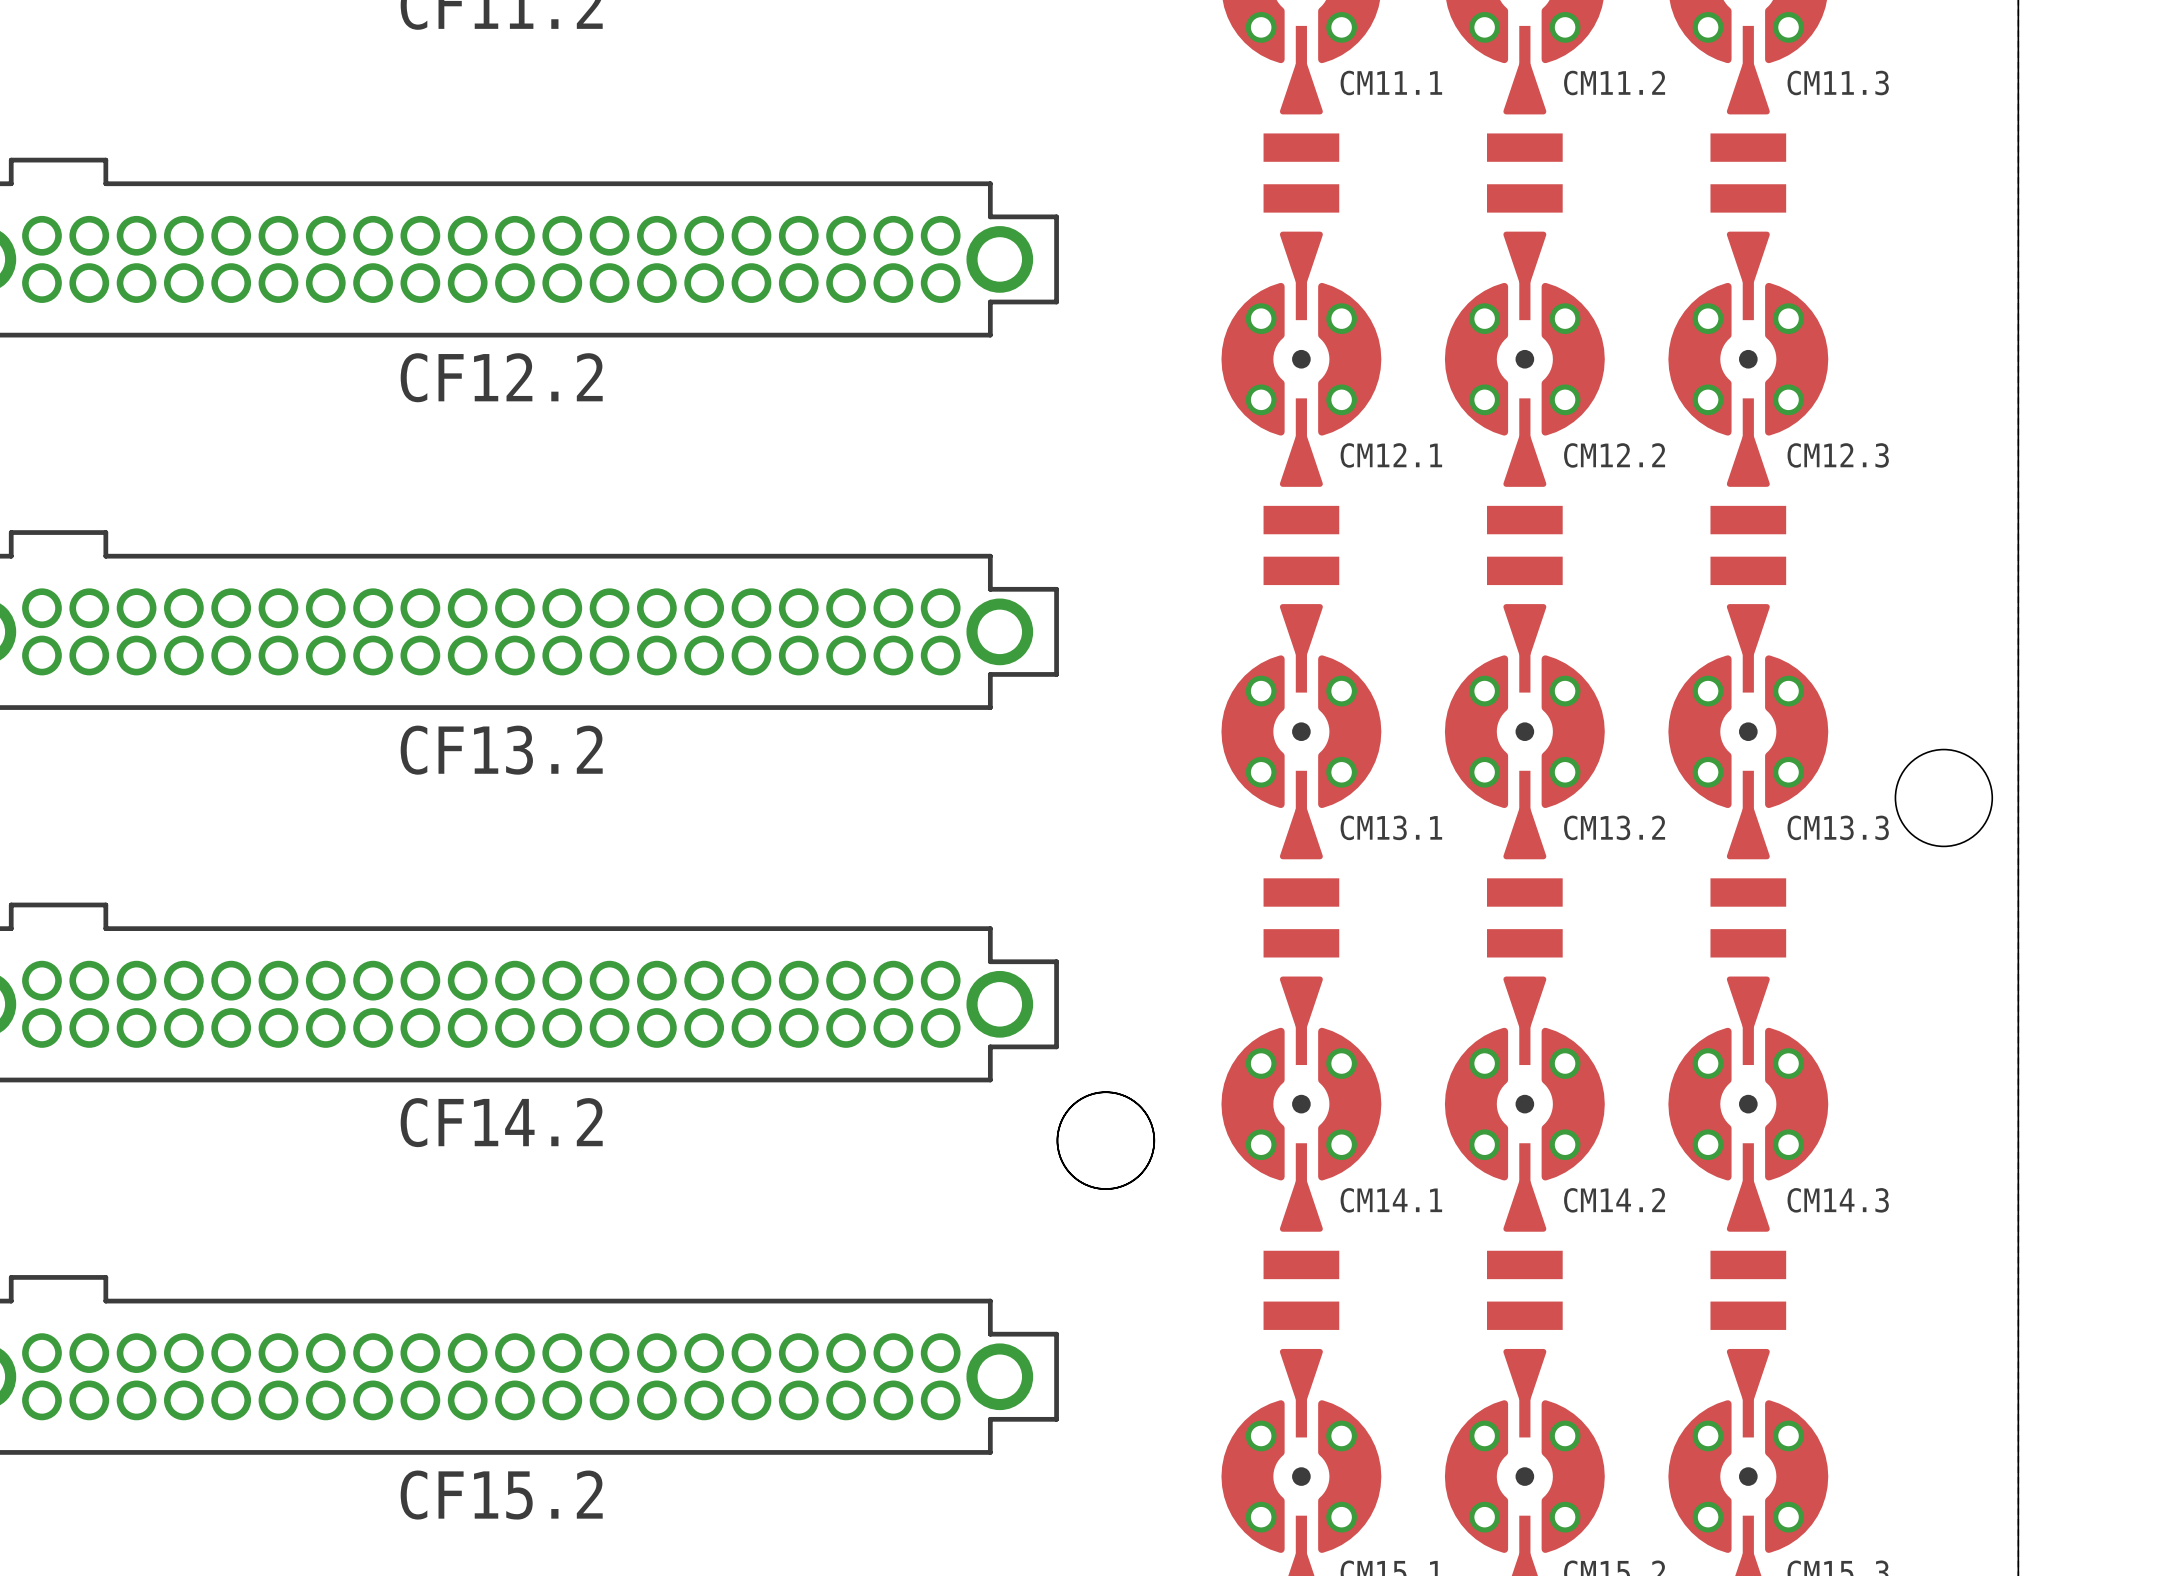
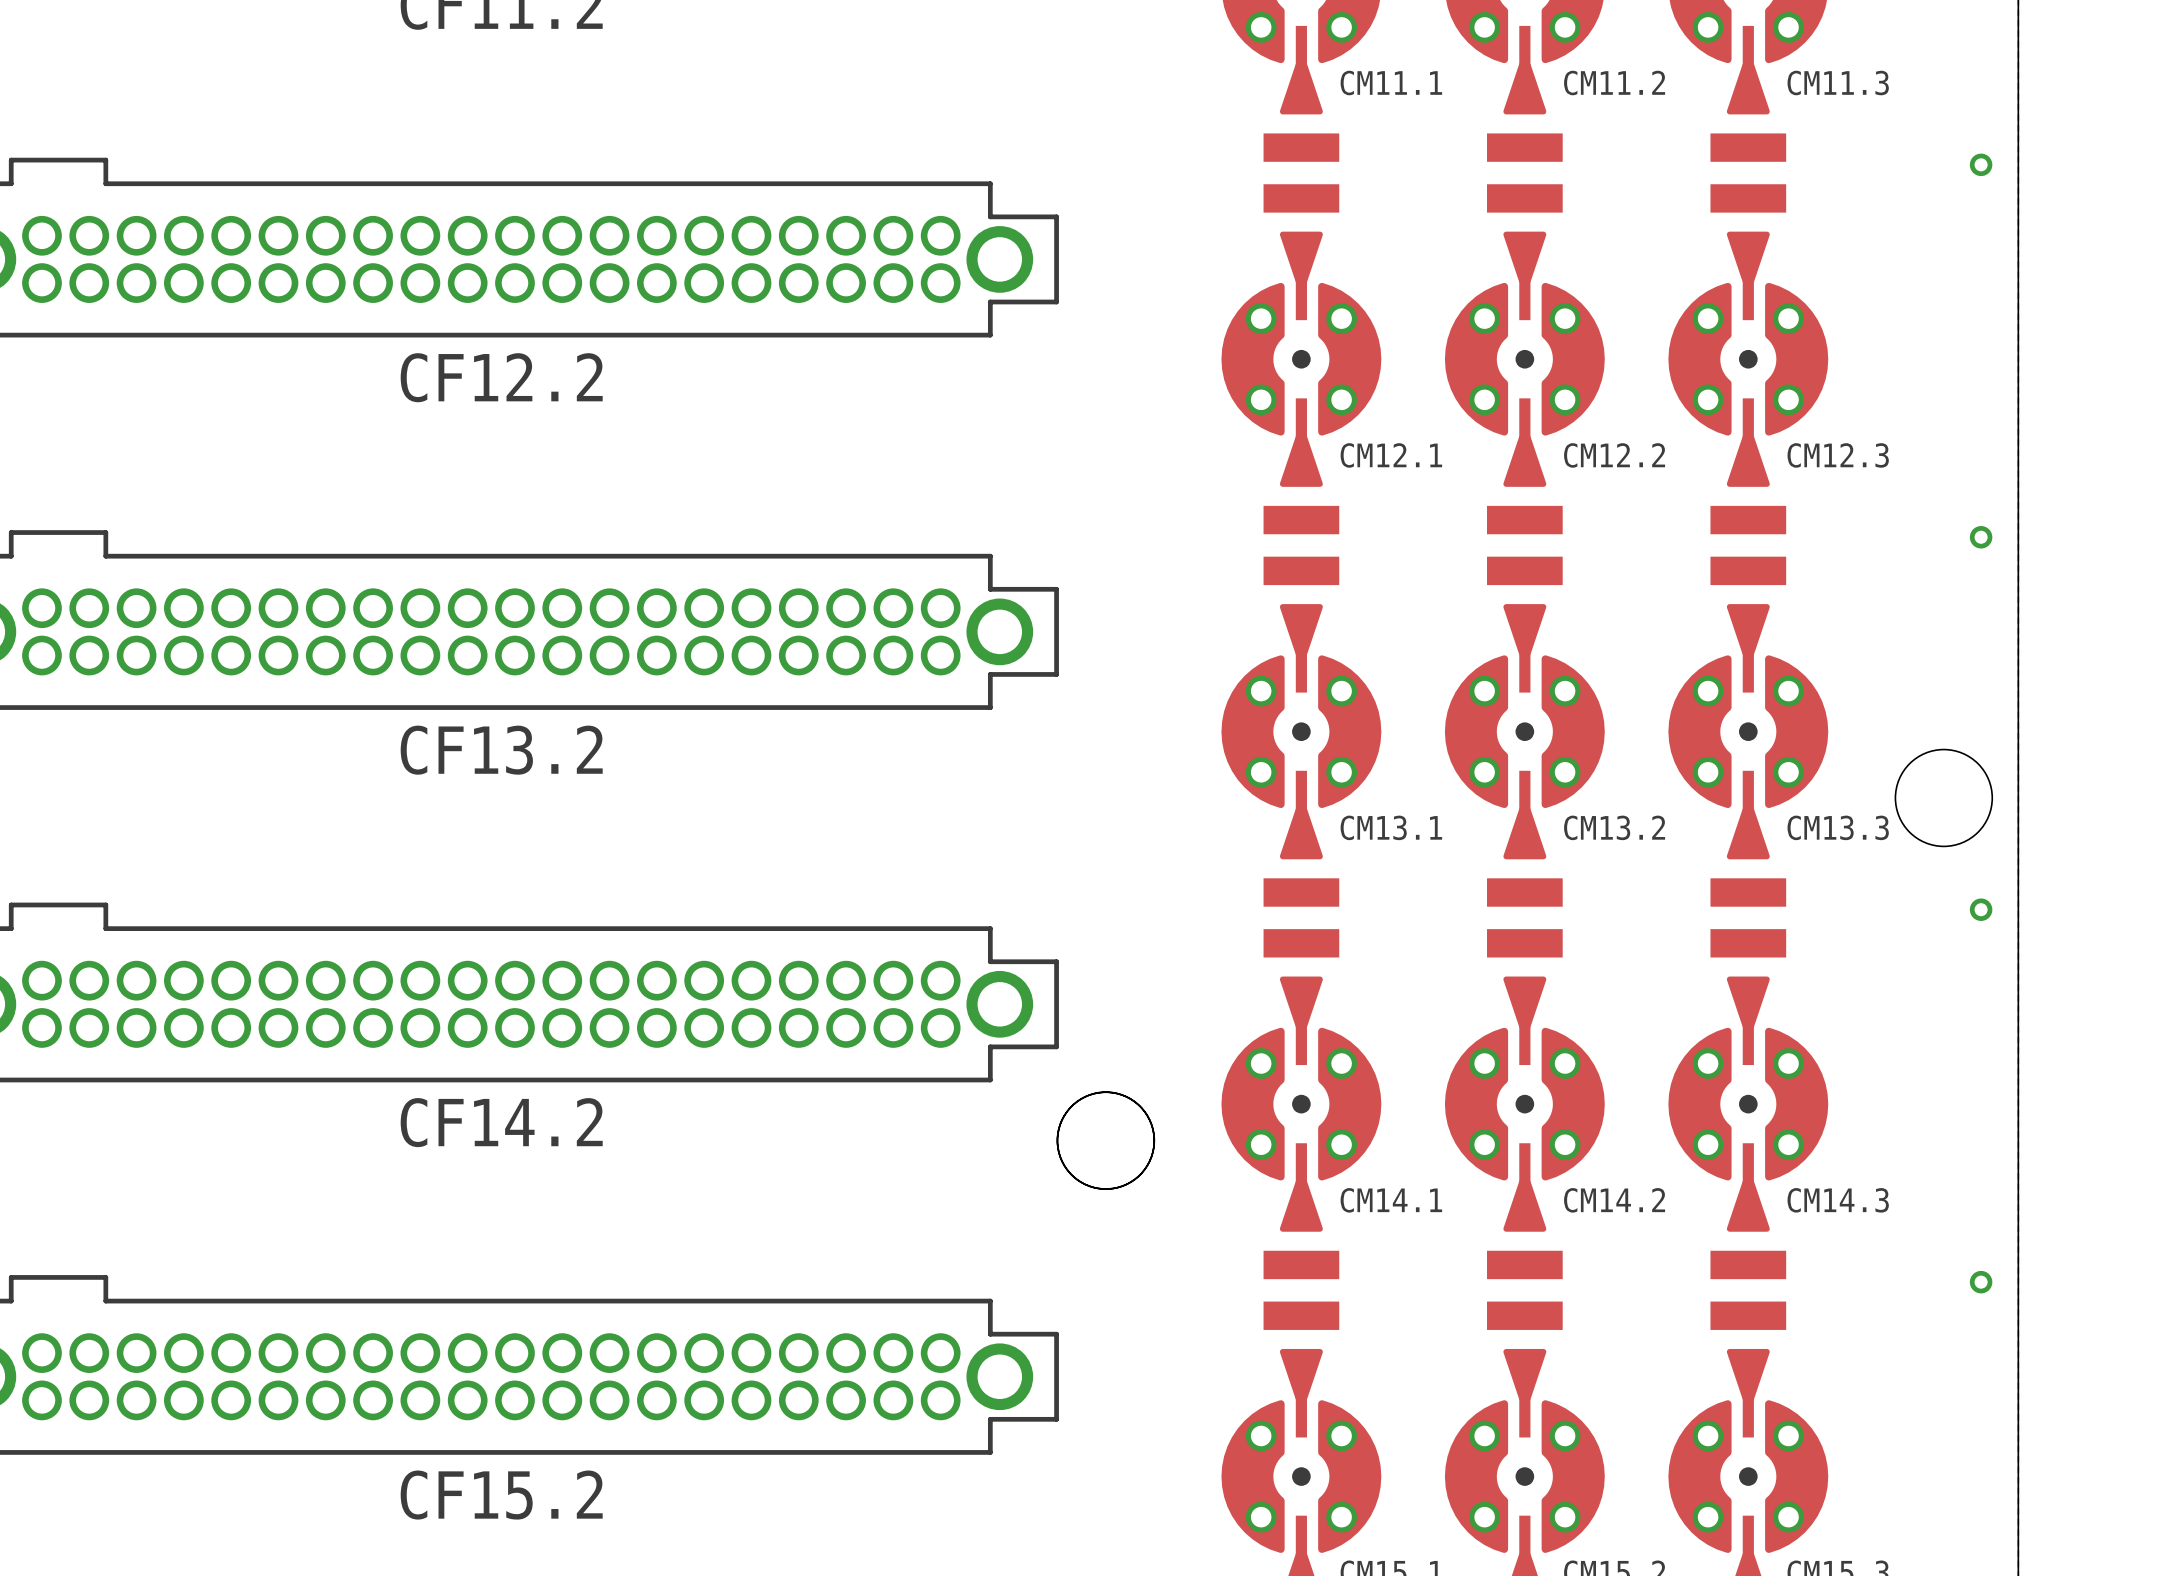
via: none -> (1981, 164)
via: none -> (1981, 537)
via: none -> (1981, 909)
via: none -> (1981, 1282)

